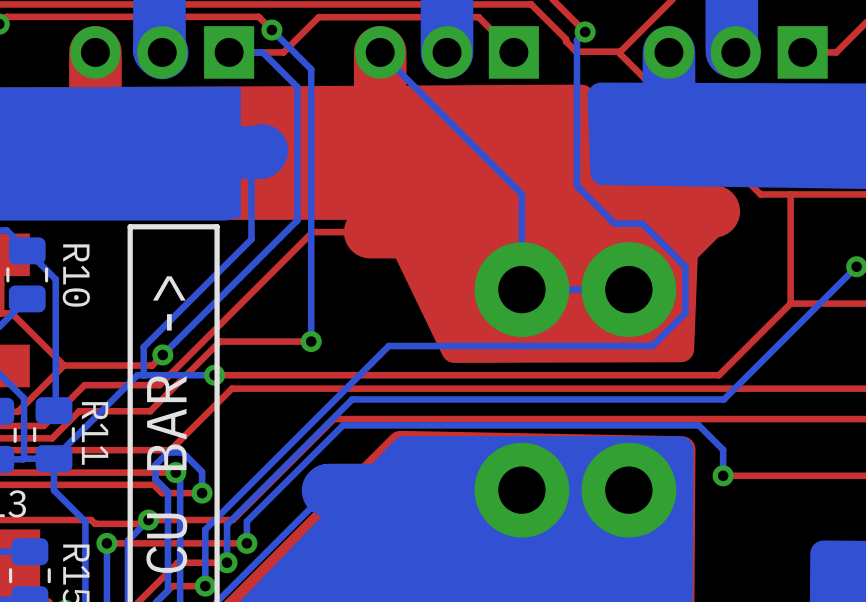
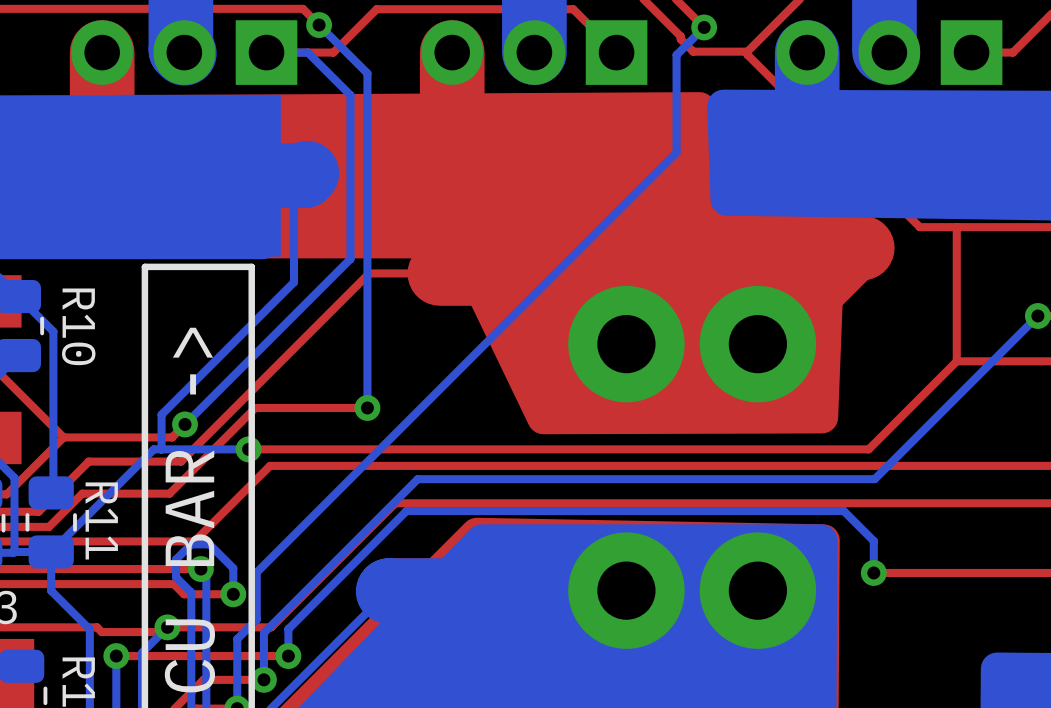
bottom track: (576, 40) (576, 186) (614, 223) (642, 223) (685, 266) (685, 312) (652, 346) (388, 346) (221, 513) -> (694, 37) (676, 55) (676, 152) (256, 572) (256, 619)
bottom track: (380, 52) (521, 194) (521, 289) (628, 289) -> none

